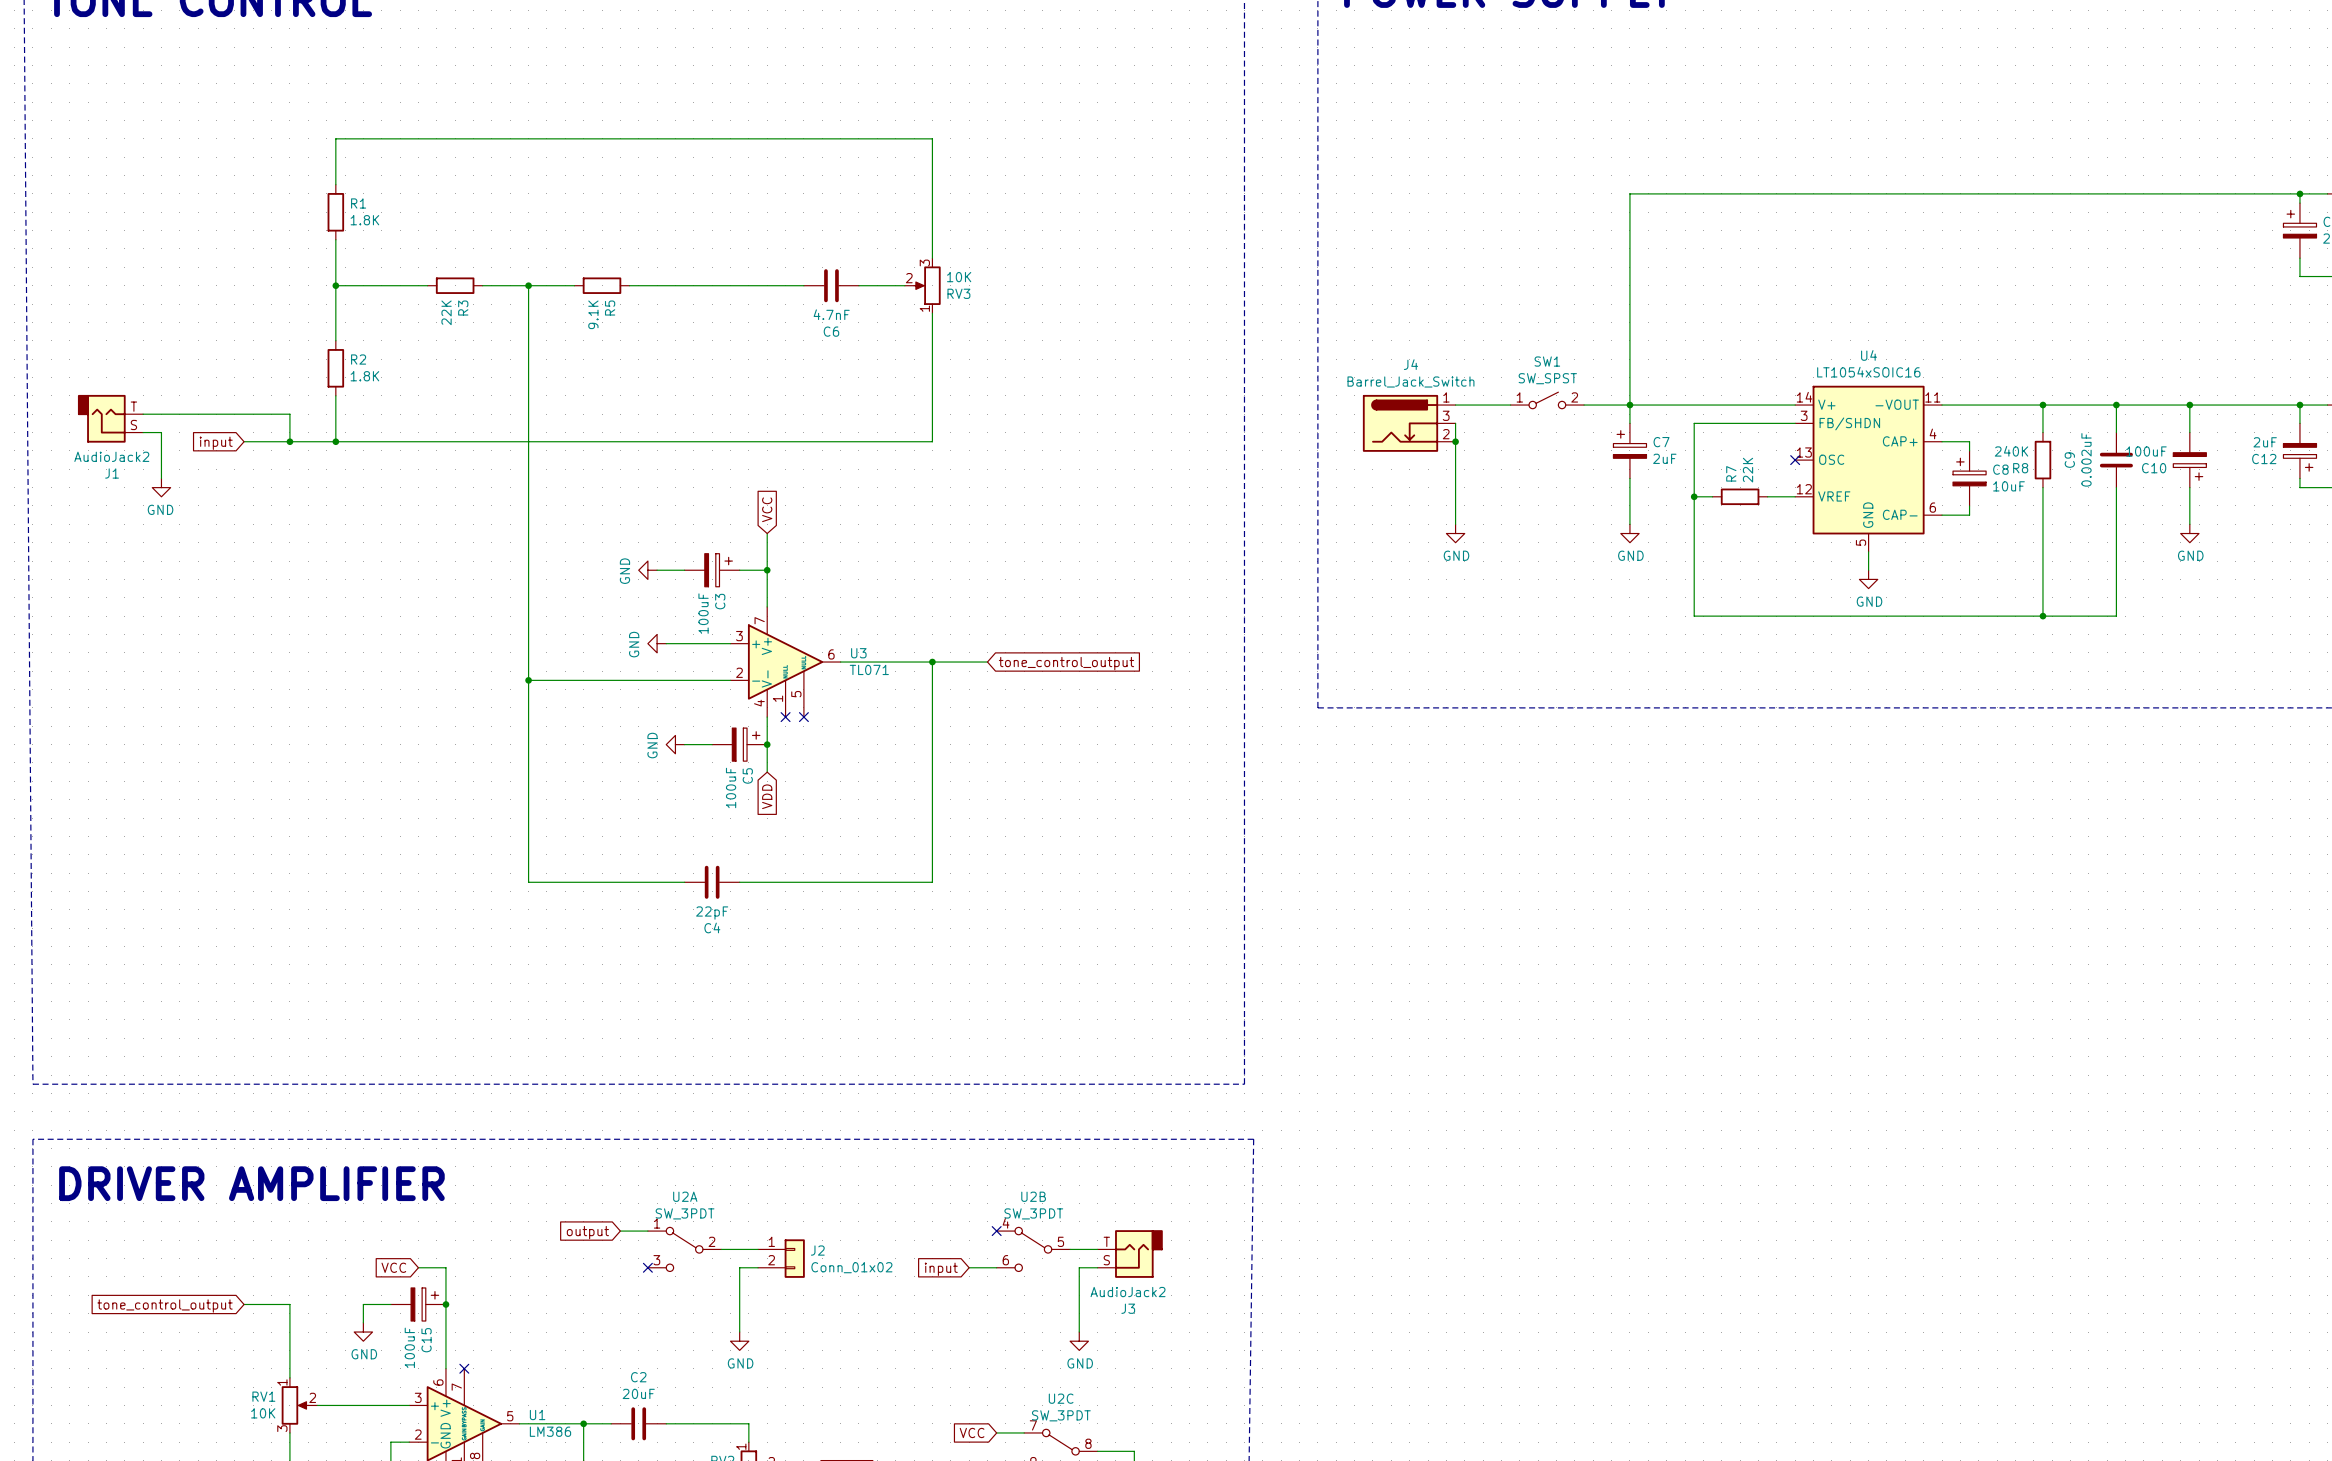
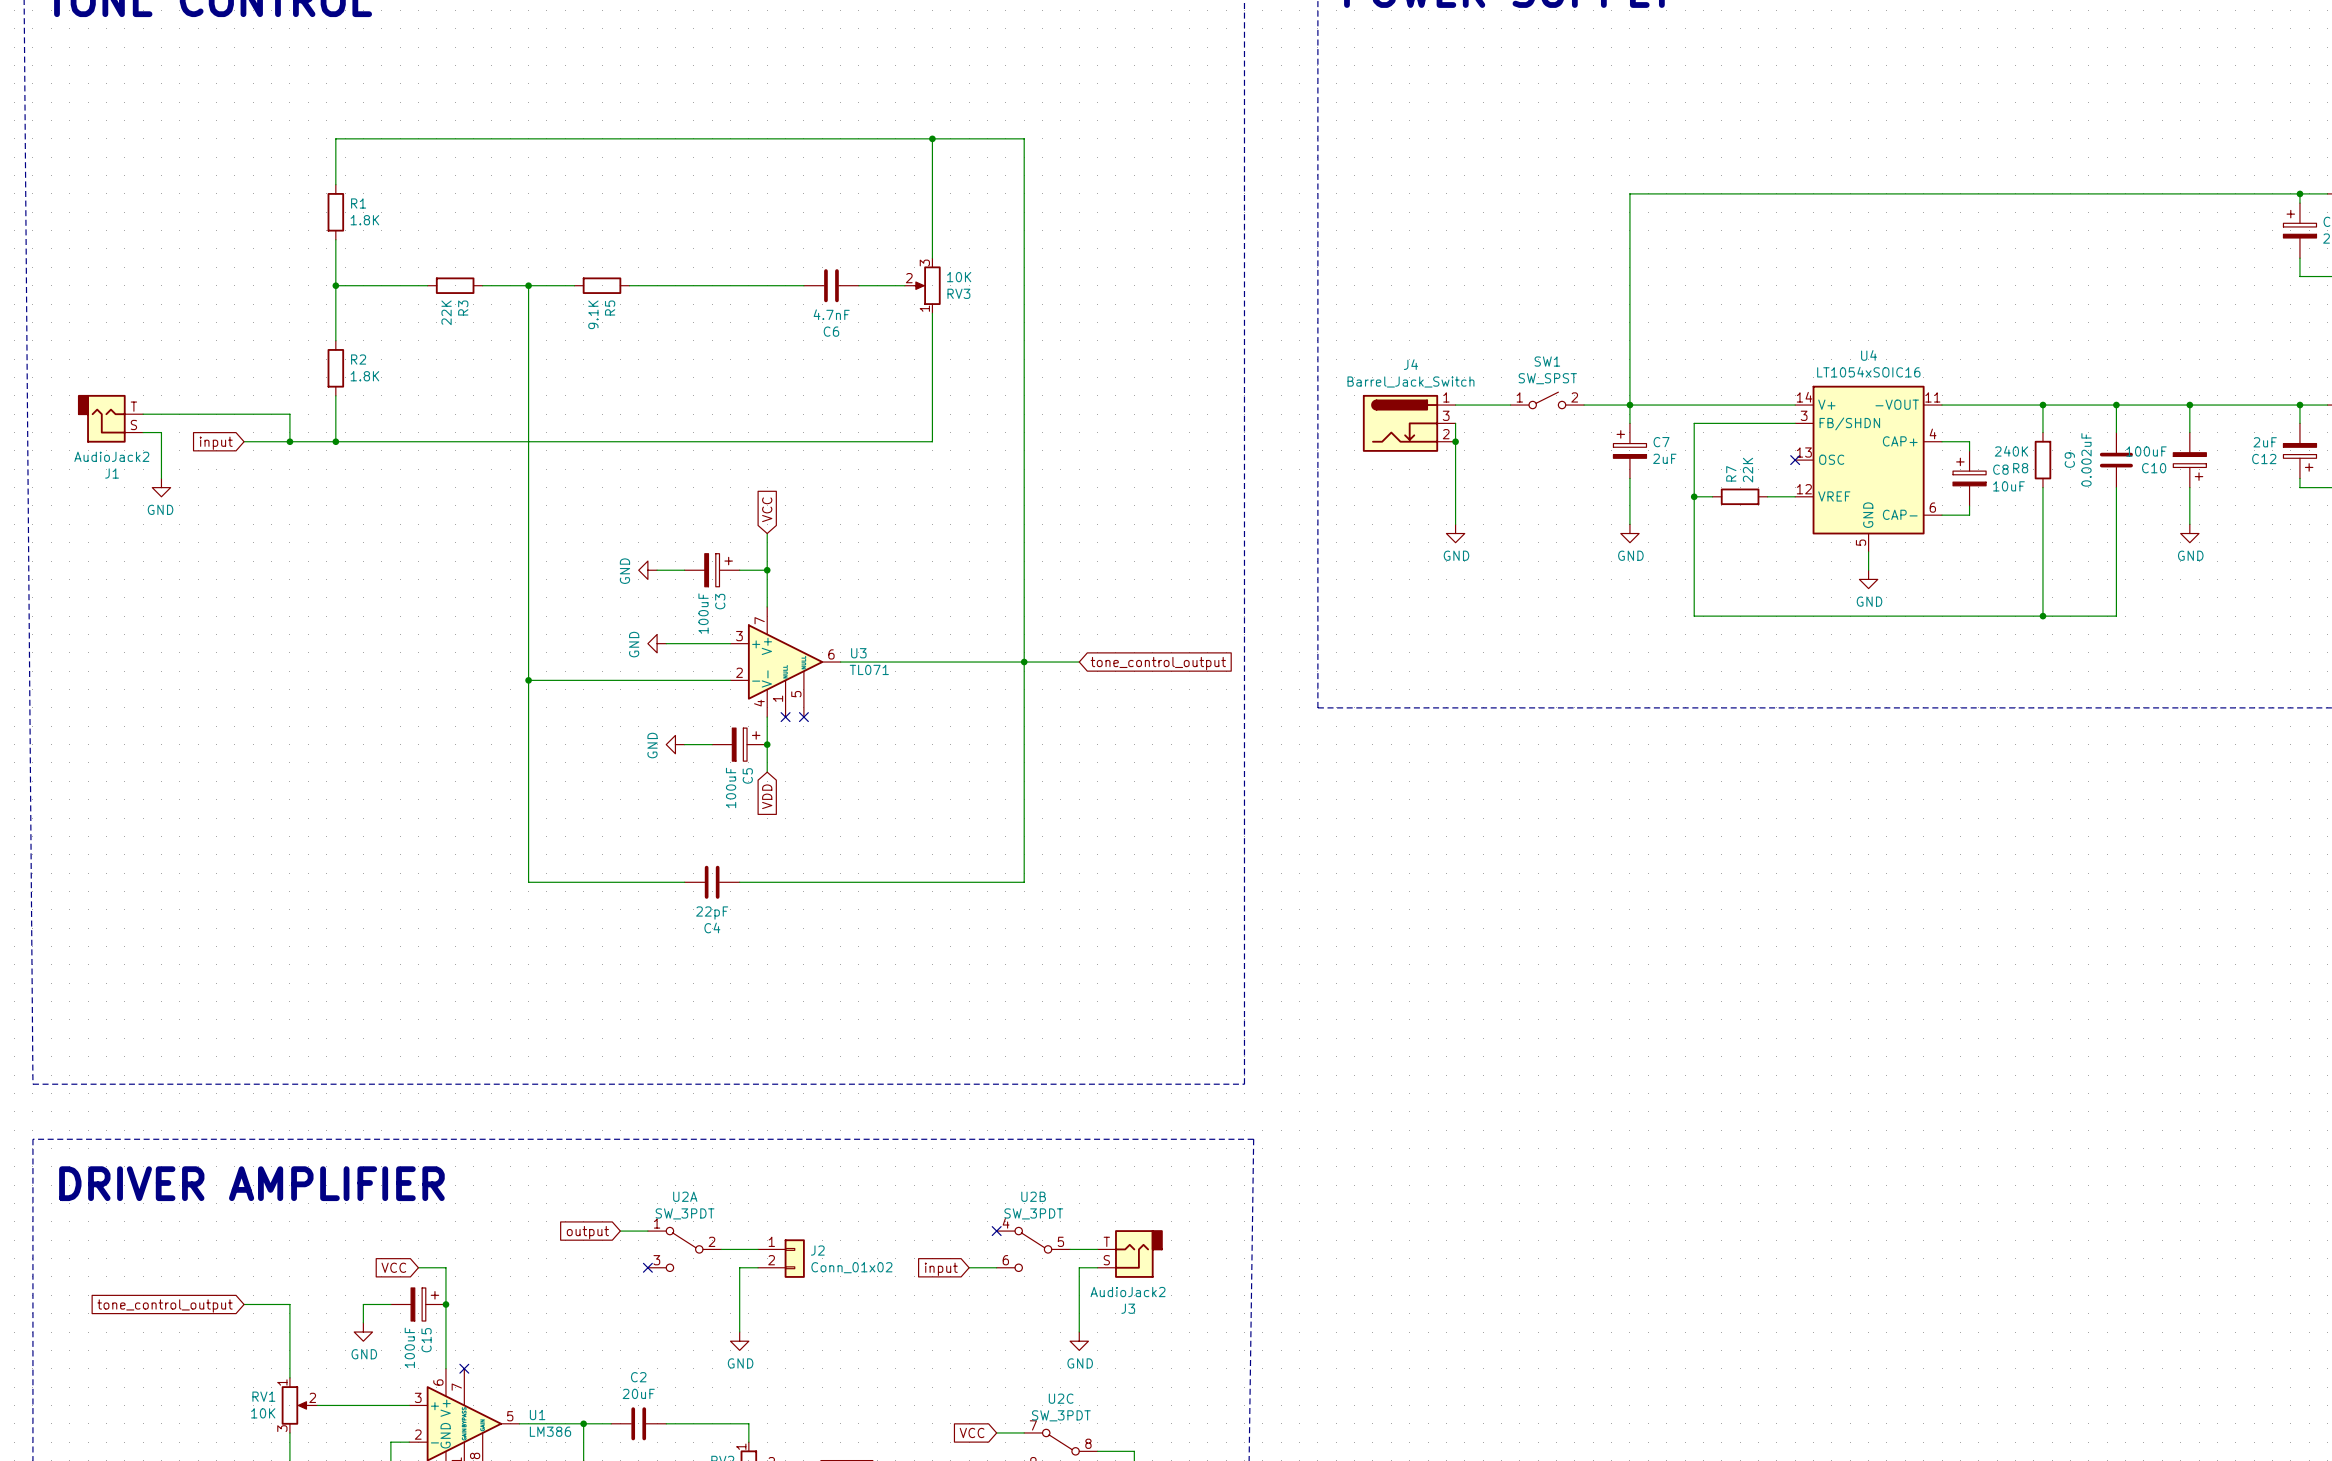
junction: none -> (932, 138)
wire: (932, 662) (932, 882) -> (932, 138) (1024, 138) (1024, 882) (932, 882)
junction: (932, 662) -> none
wire: none -> (987, 662) (1079, 662)
junction: none -> (1024, 662)
global label position: tone_control_output (1066, 663) -> tone_control_output (1158, 663)

